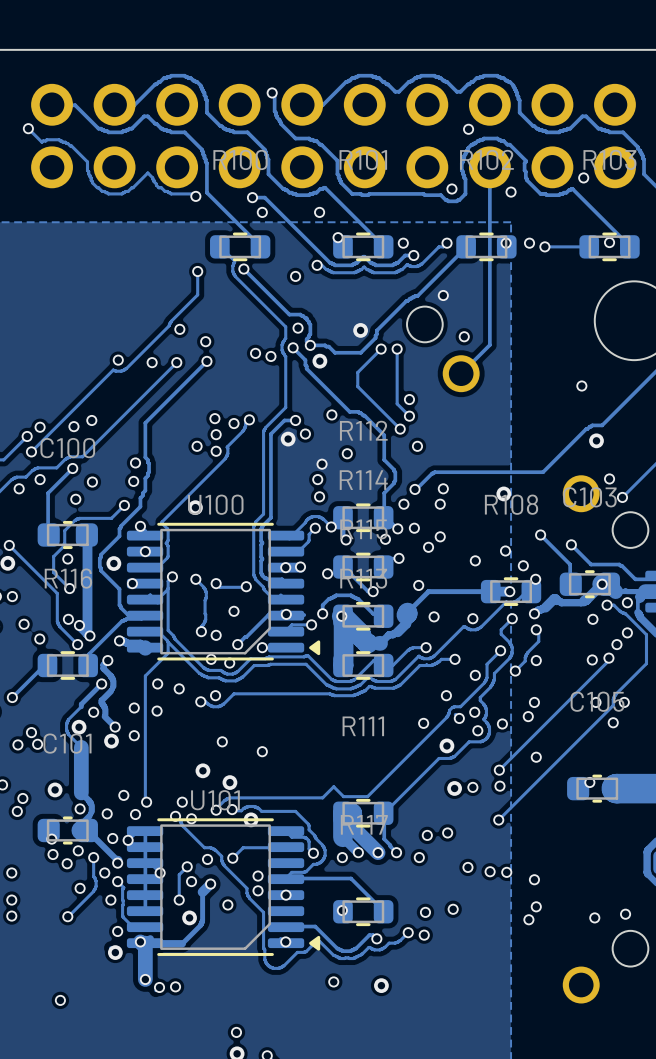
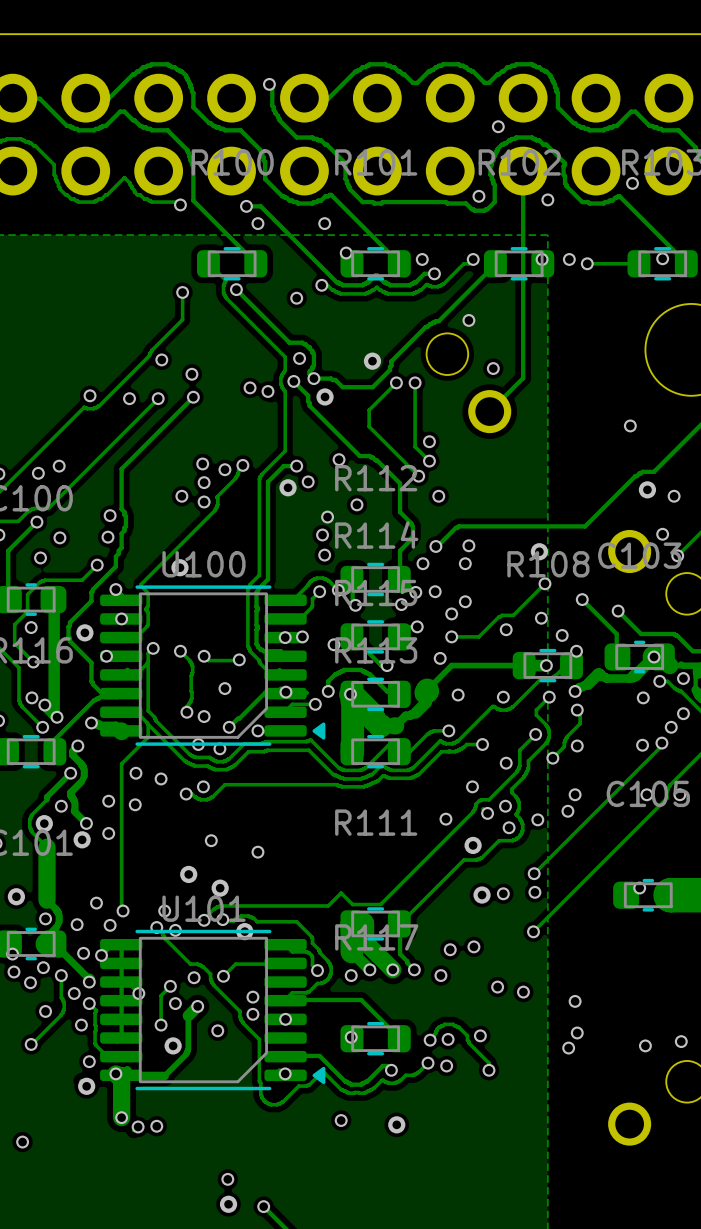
via: none -> (674, 496)
track: none -> (544, 583) (513, 615) (499, 616) (478, 636) (451, 636)
via: none -> (544, 583)
via: none -> (451, 636)
via: (613, 722) -> none
via: (536, 757) -> none
via: (506, 872) -> none
track: none -> (430, 1040) (437, 1028) (444, 1024) (453, 1024) (458, 1027) (467, 1035) (468, 1043) (489, 1063) (489, 1070)
via: none -> (430, 1040)
via: none -> (489, 1070)

